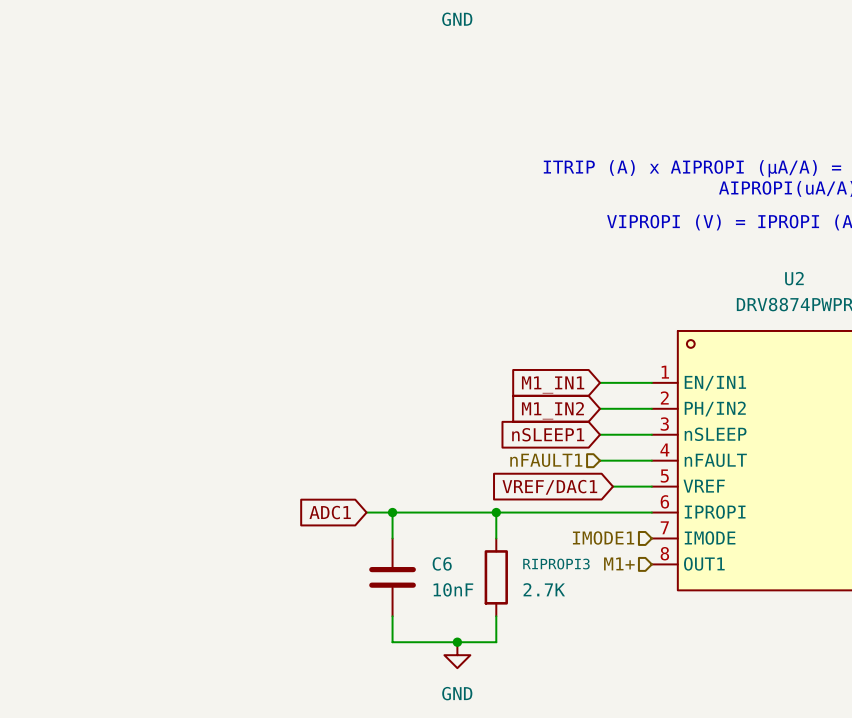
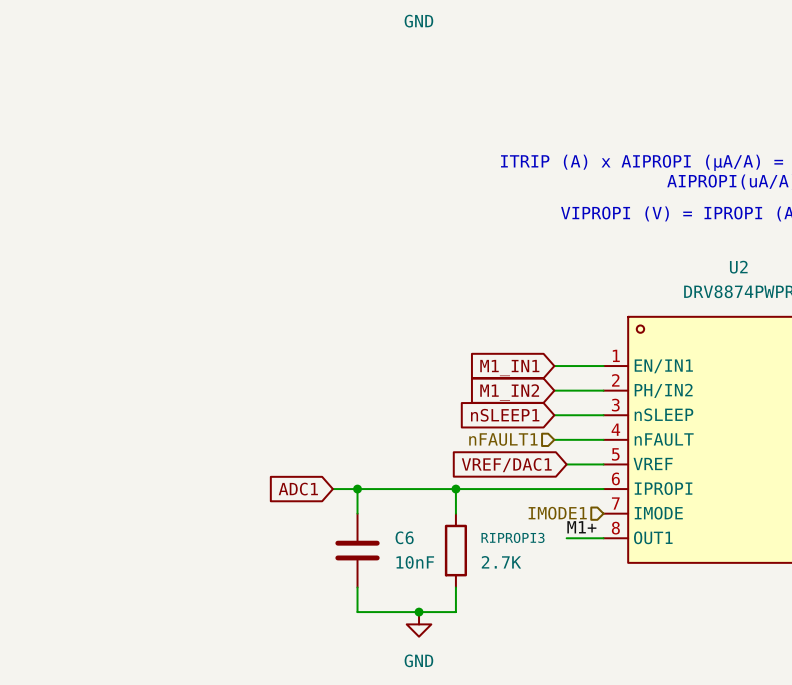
label: none -> M1+ (581, 527)
hierarchical label: M1+ (619, 563) -> none
wire: none -> (566, 538) (603, 538)

